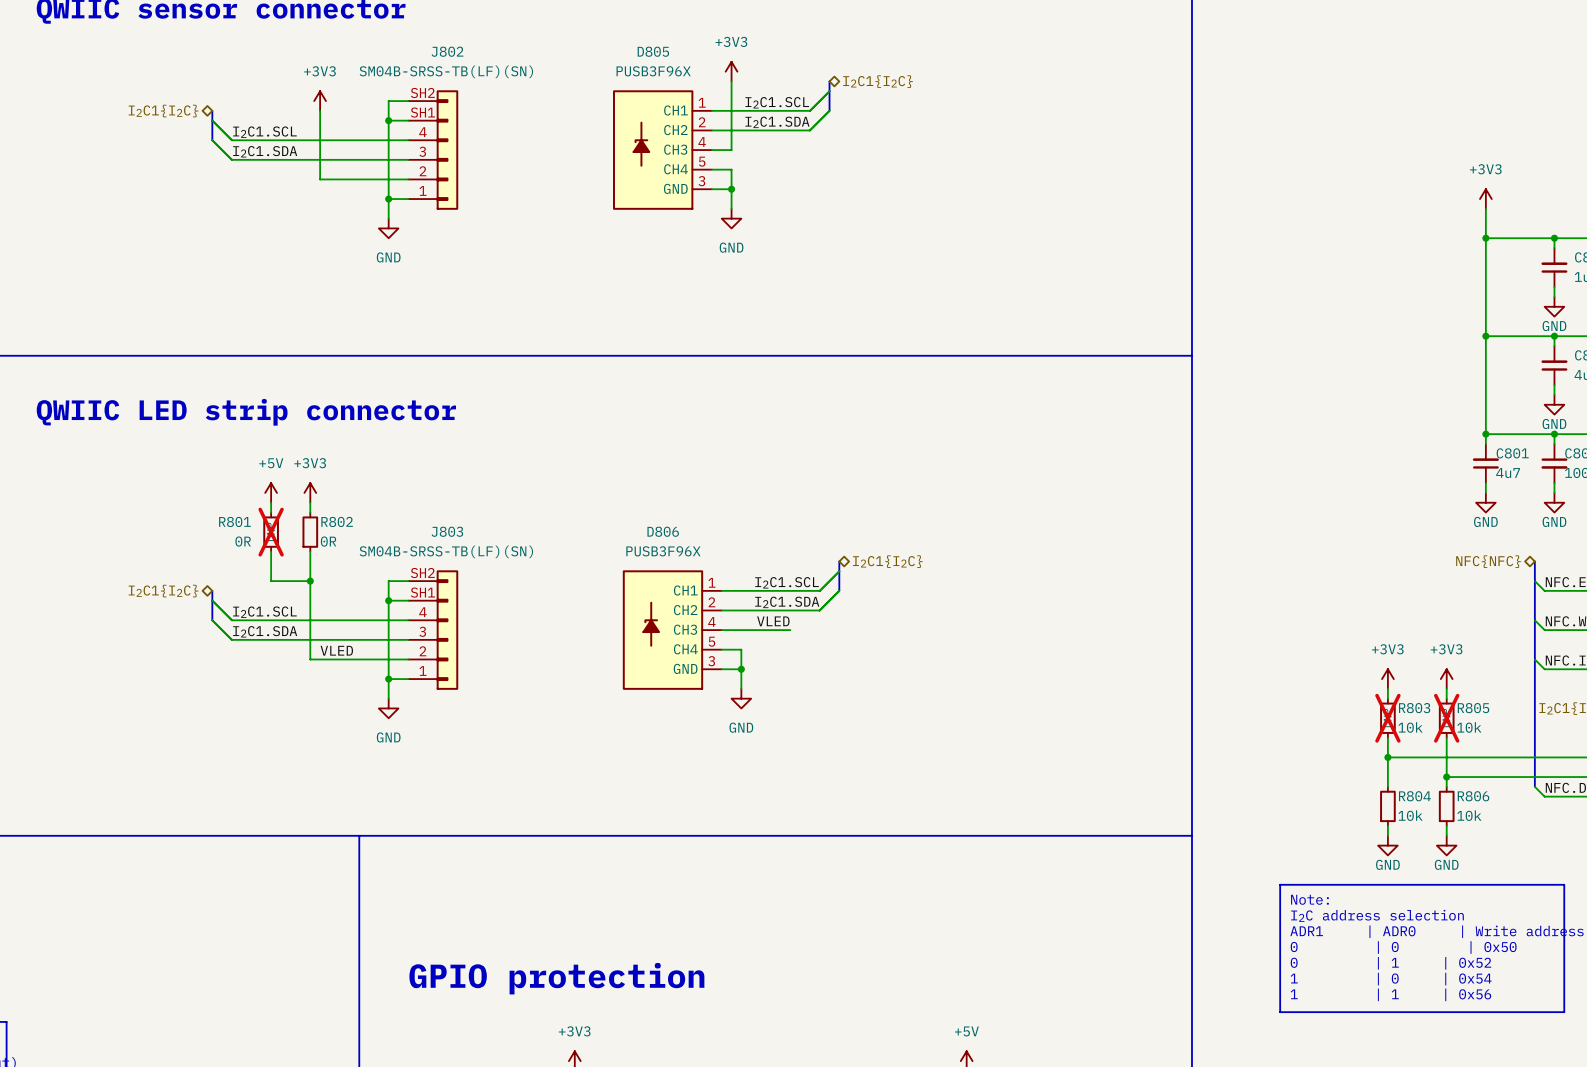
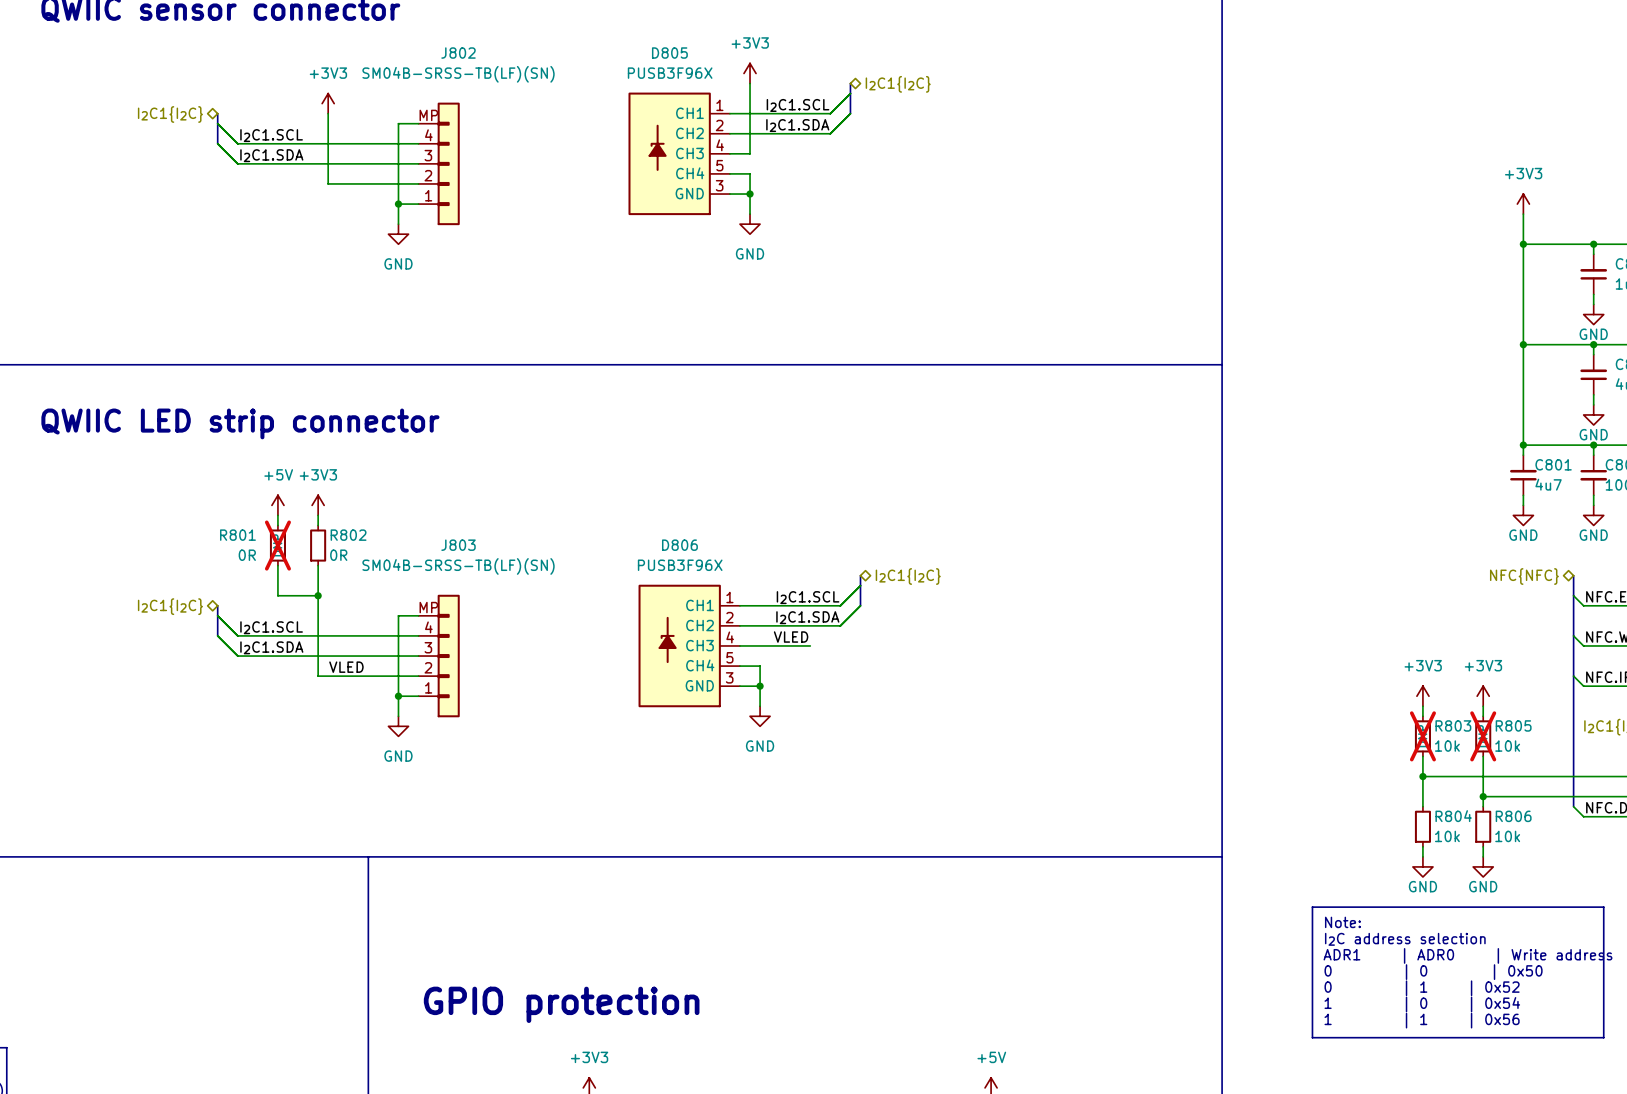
J802 symbol: [408, 90, 459, 210] -> [418, 102, 460, 226]
wire: (408, 101) (388, 101) (388, 120) -> none
junction: (388, 120) -> none
J803 symbol: [408, 570, 459, 690] -> [418, 594, 460, 718]
wire: (408, 581) (388, 581) (388, 600) -> none
junction: (388, 600) -> none

